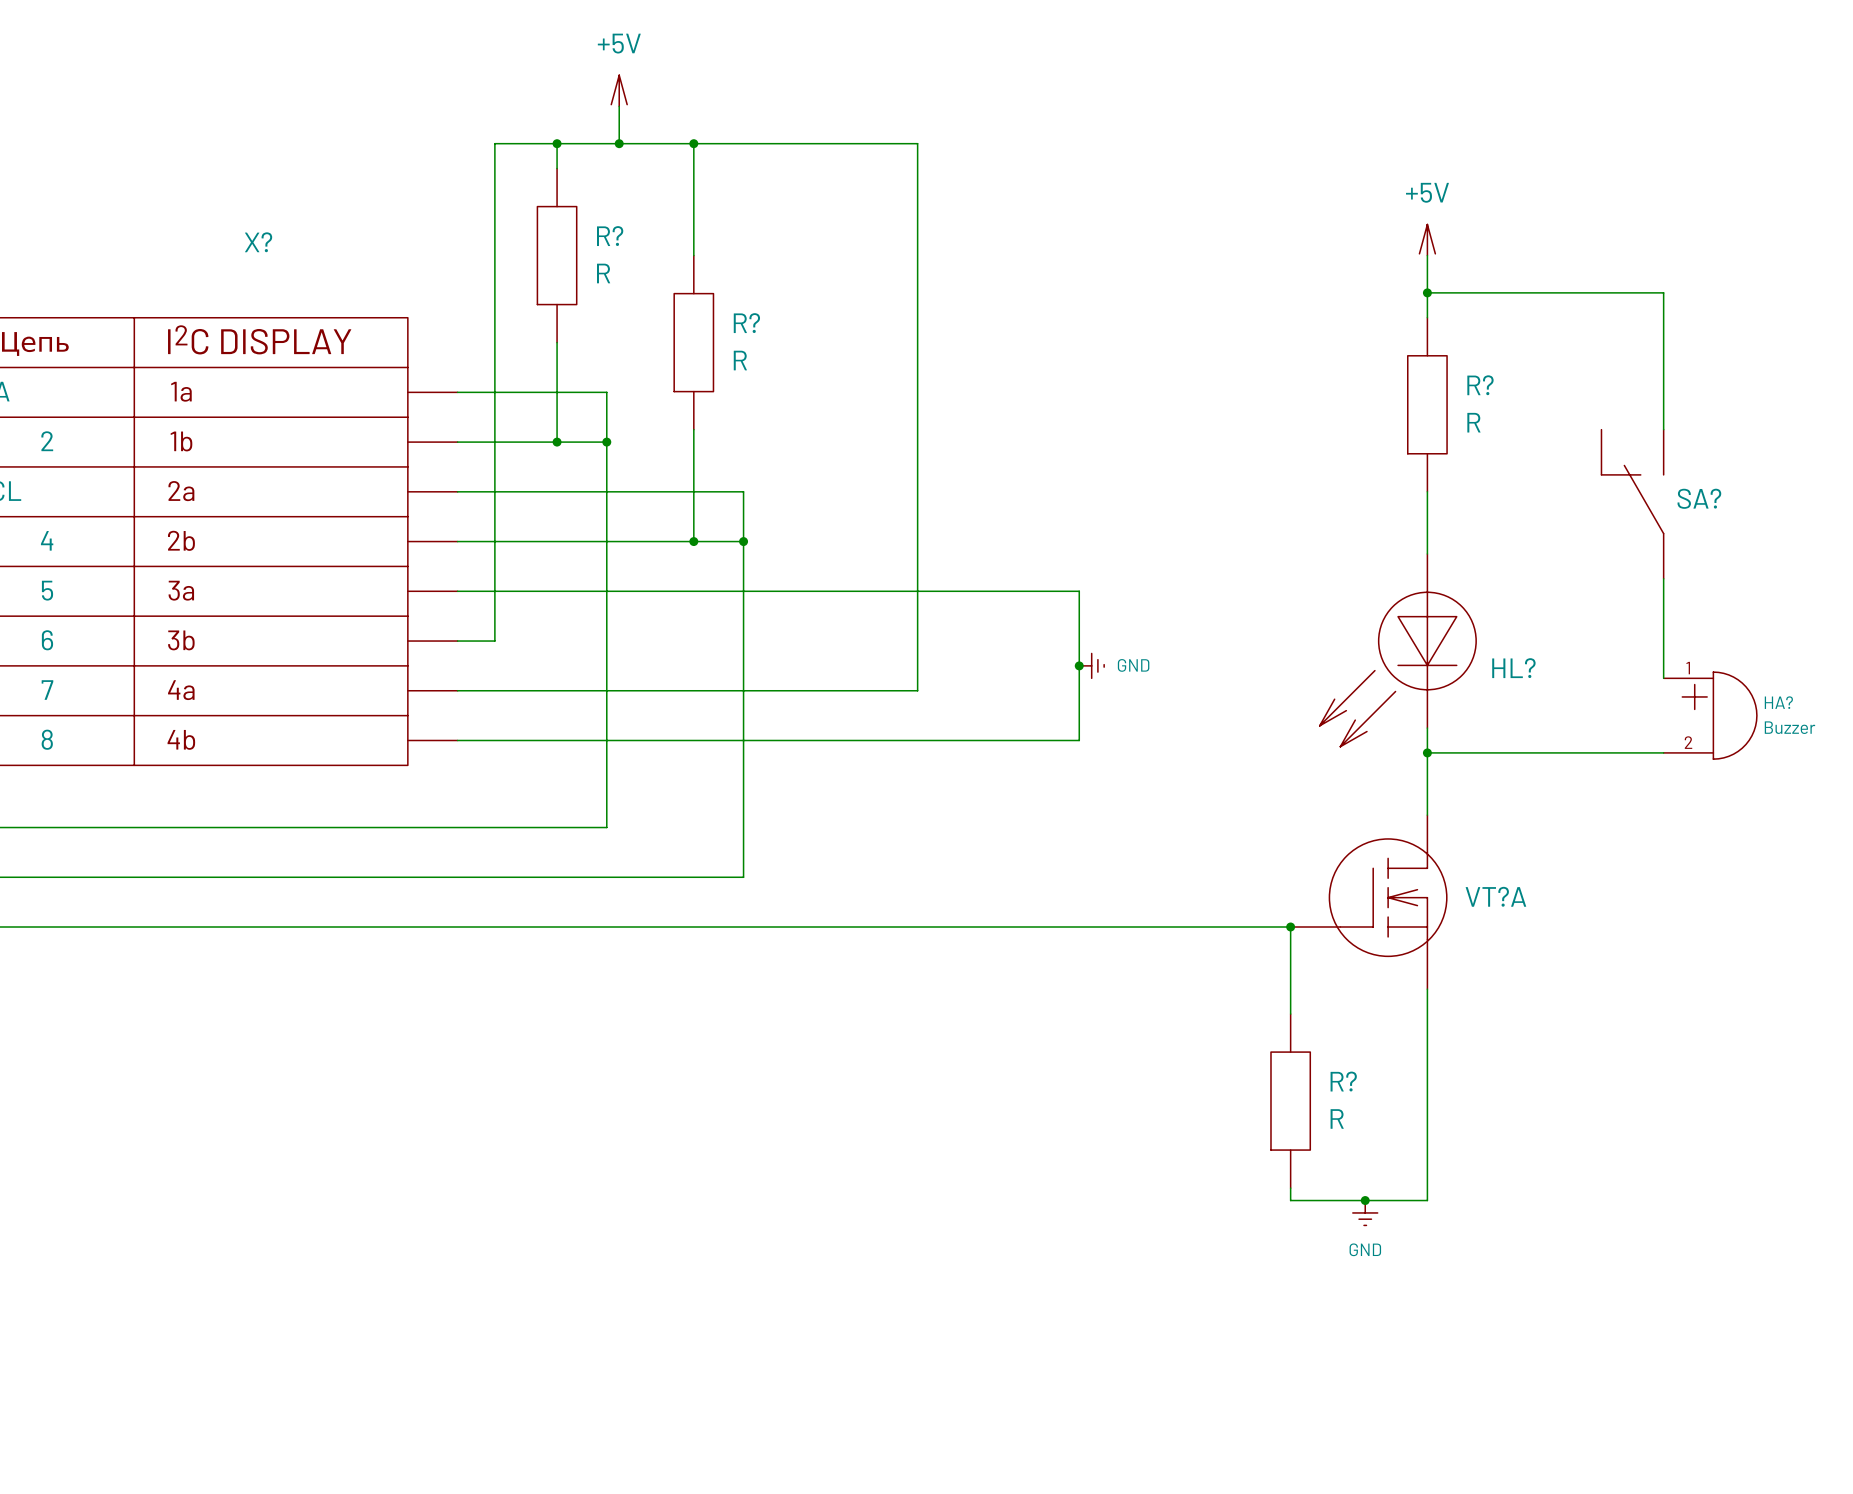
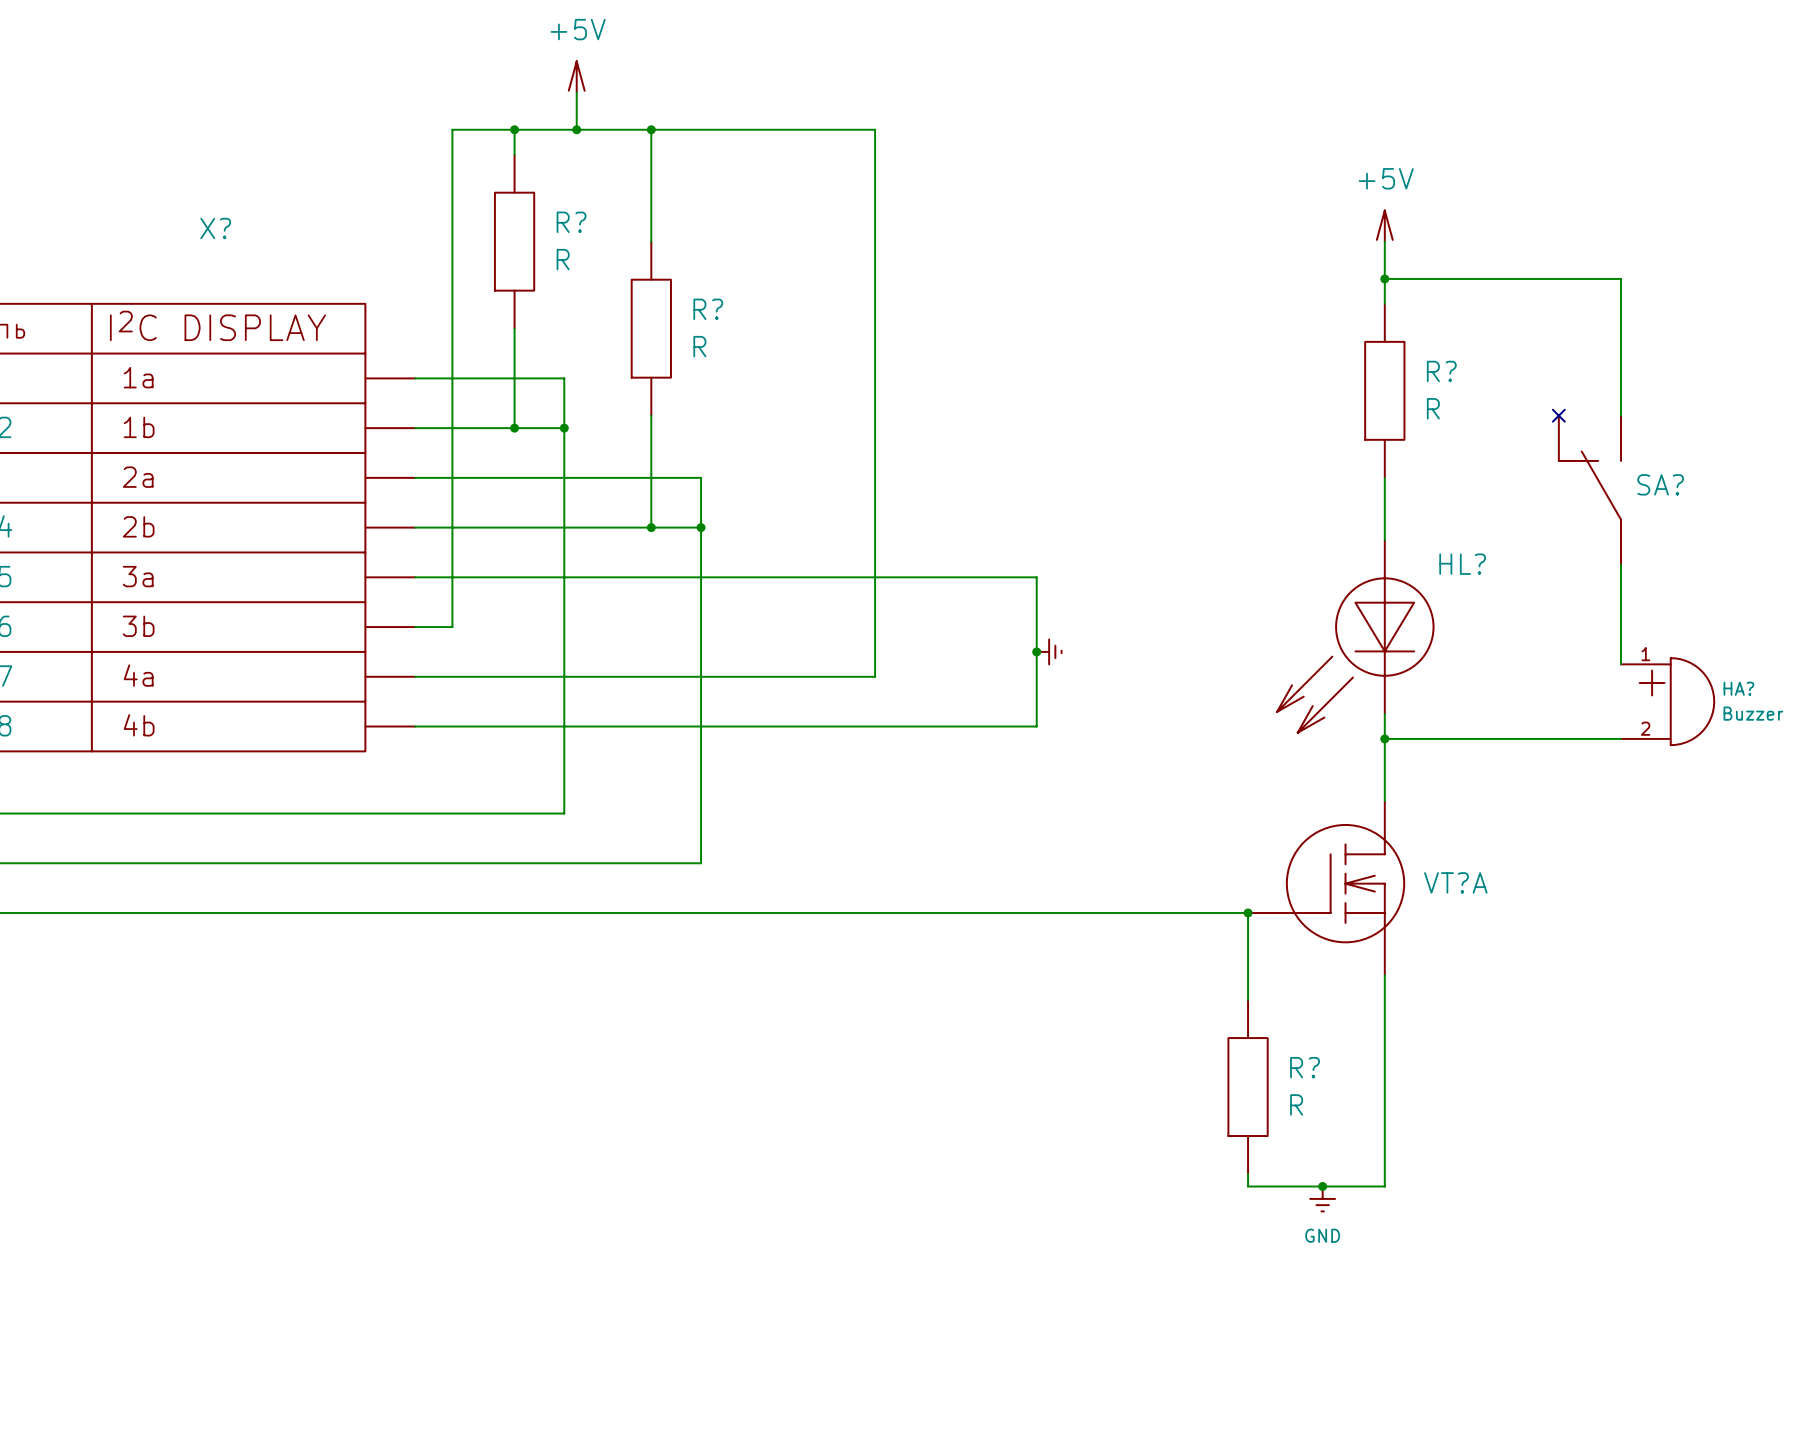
no-connect mark: none -> (1558, 415)
power symbol text: GND (1133, 665) -> none
HL? name position: HL? (1513, 668) -> HL? (1462, 564)

